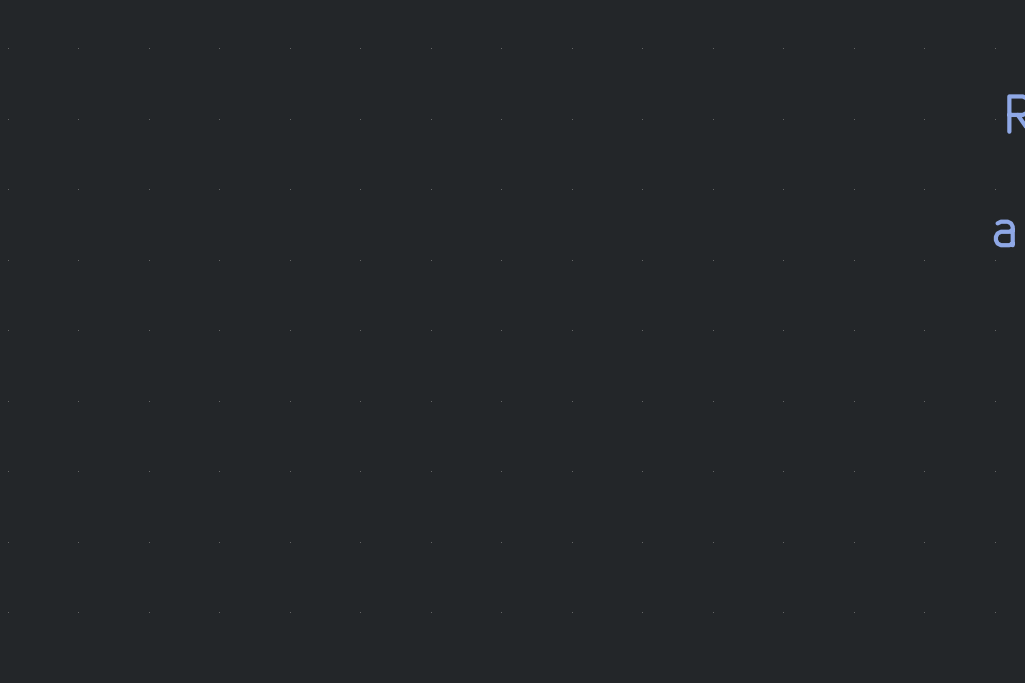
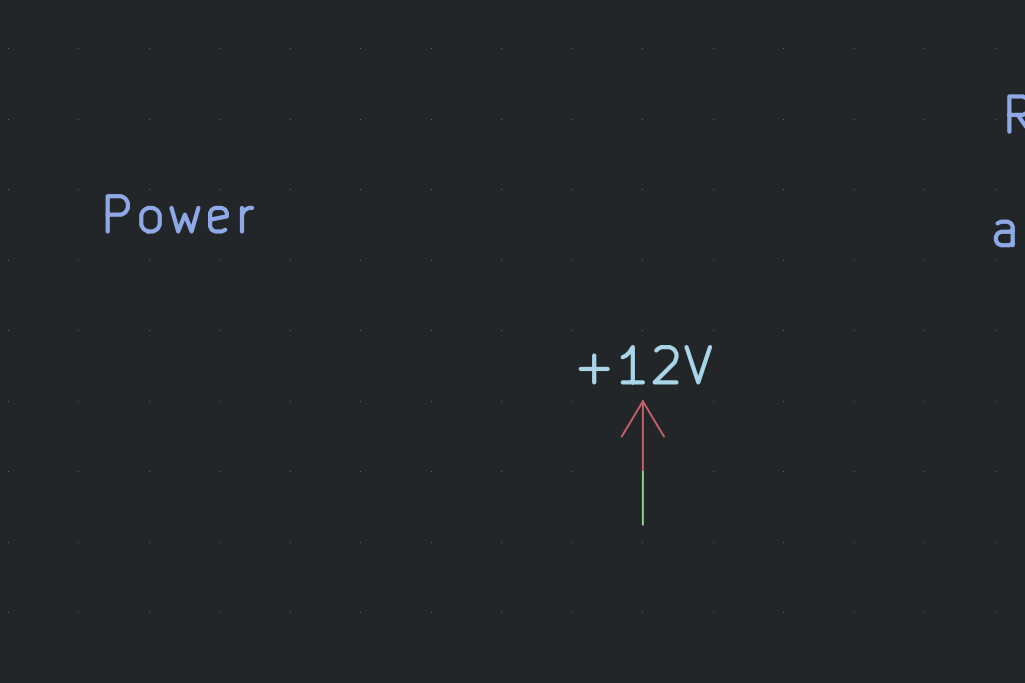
text: none -> Power (179, 213)
power symbol: none -> +12V (642, 436)
wire: none -> (642, 471) (642, 524)

